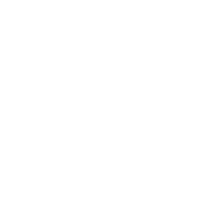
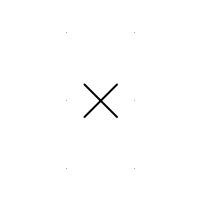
no-connect mark: none -> (100, 100)

